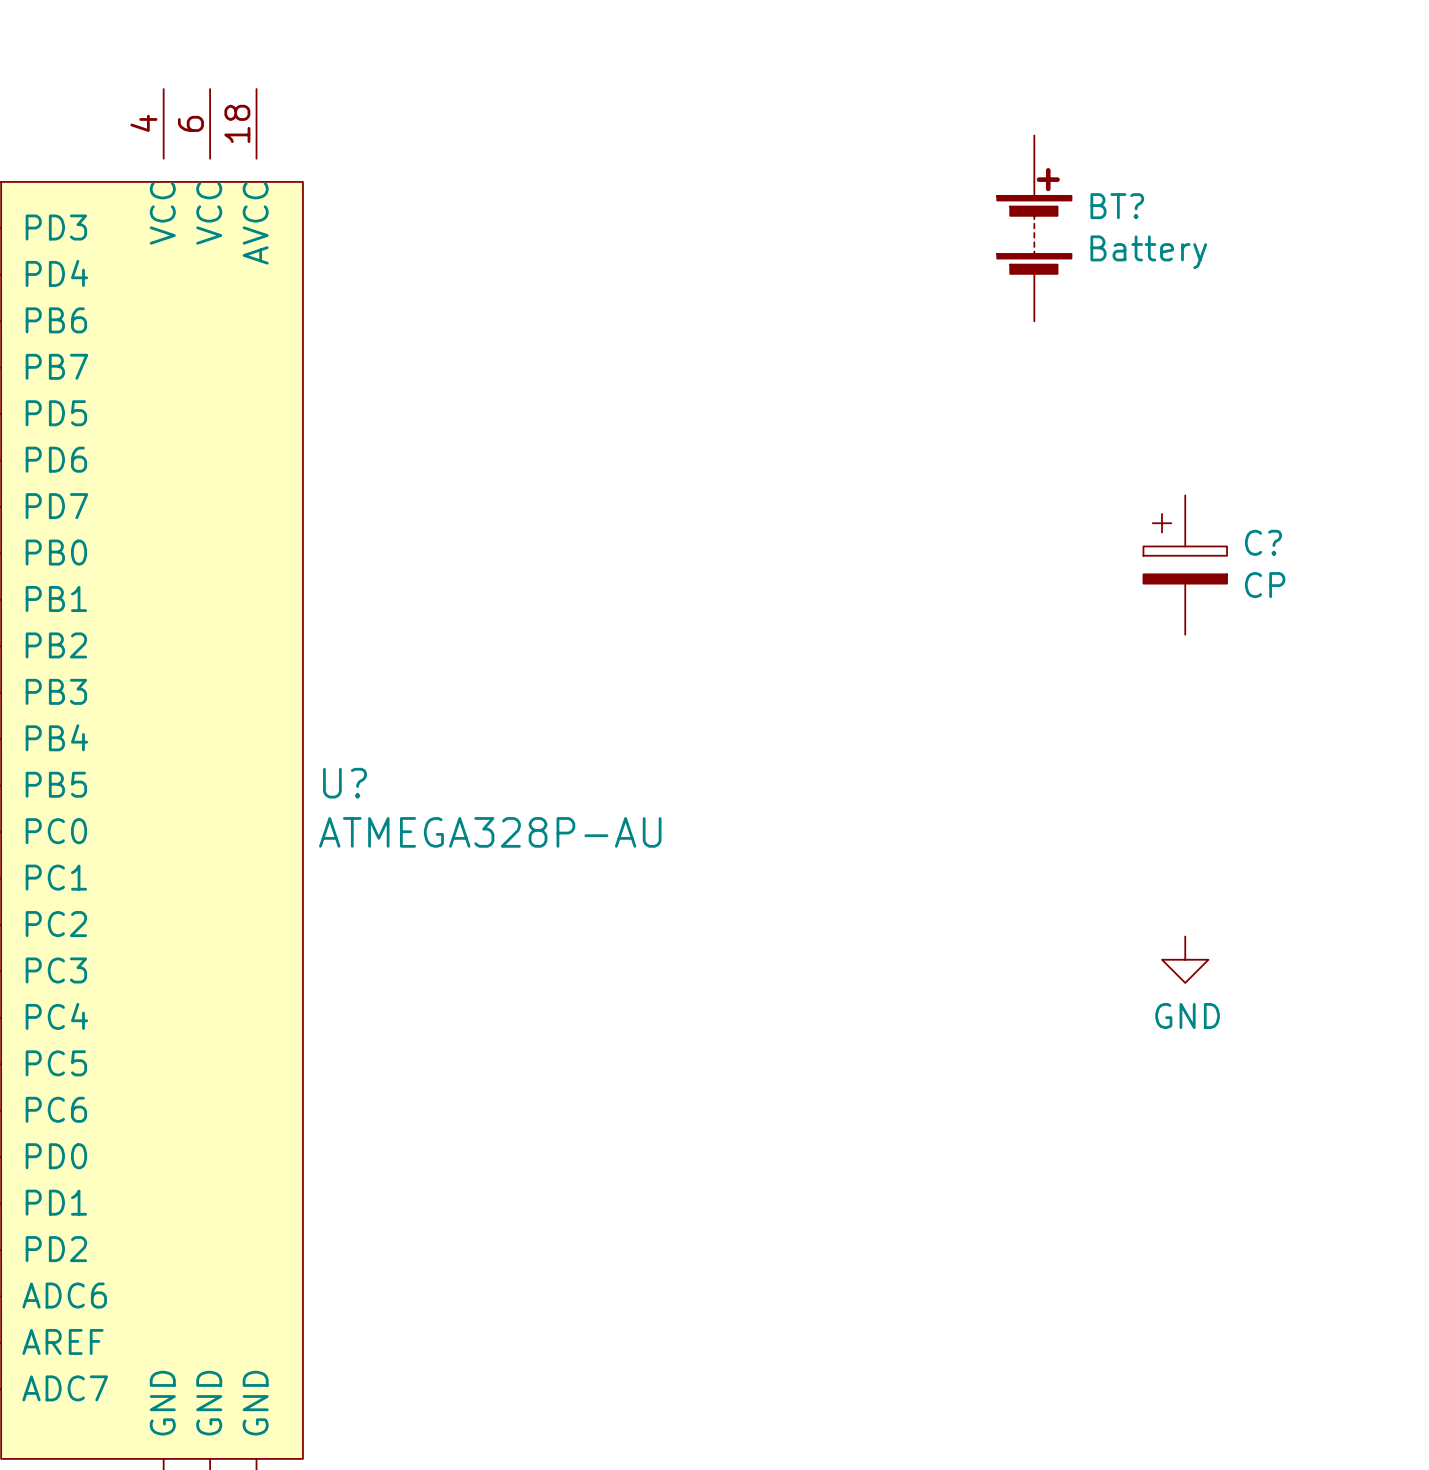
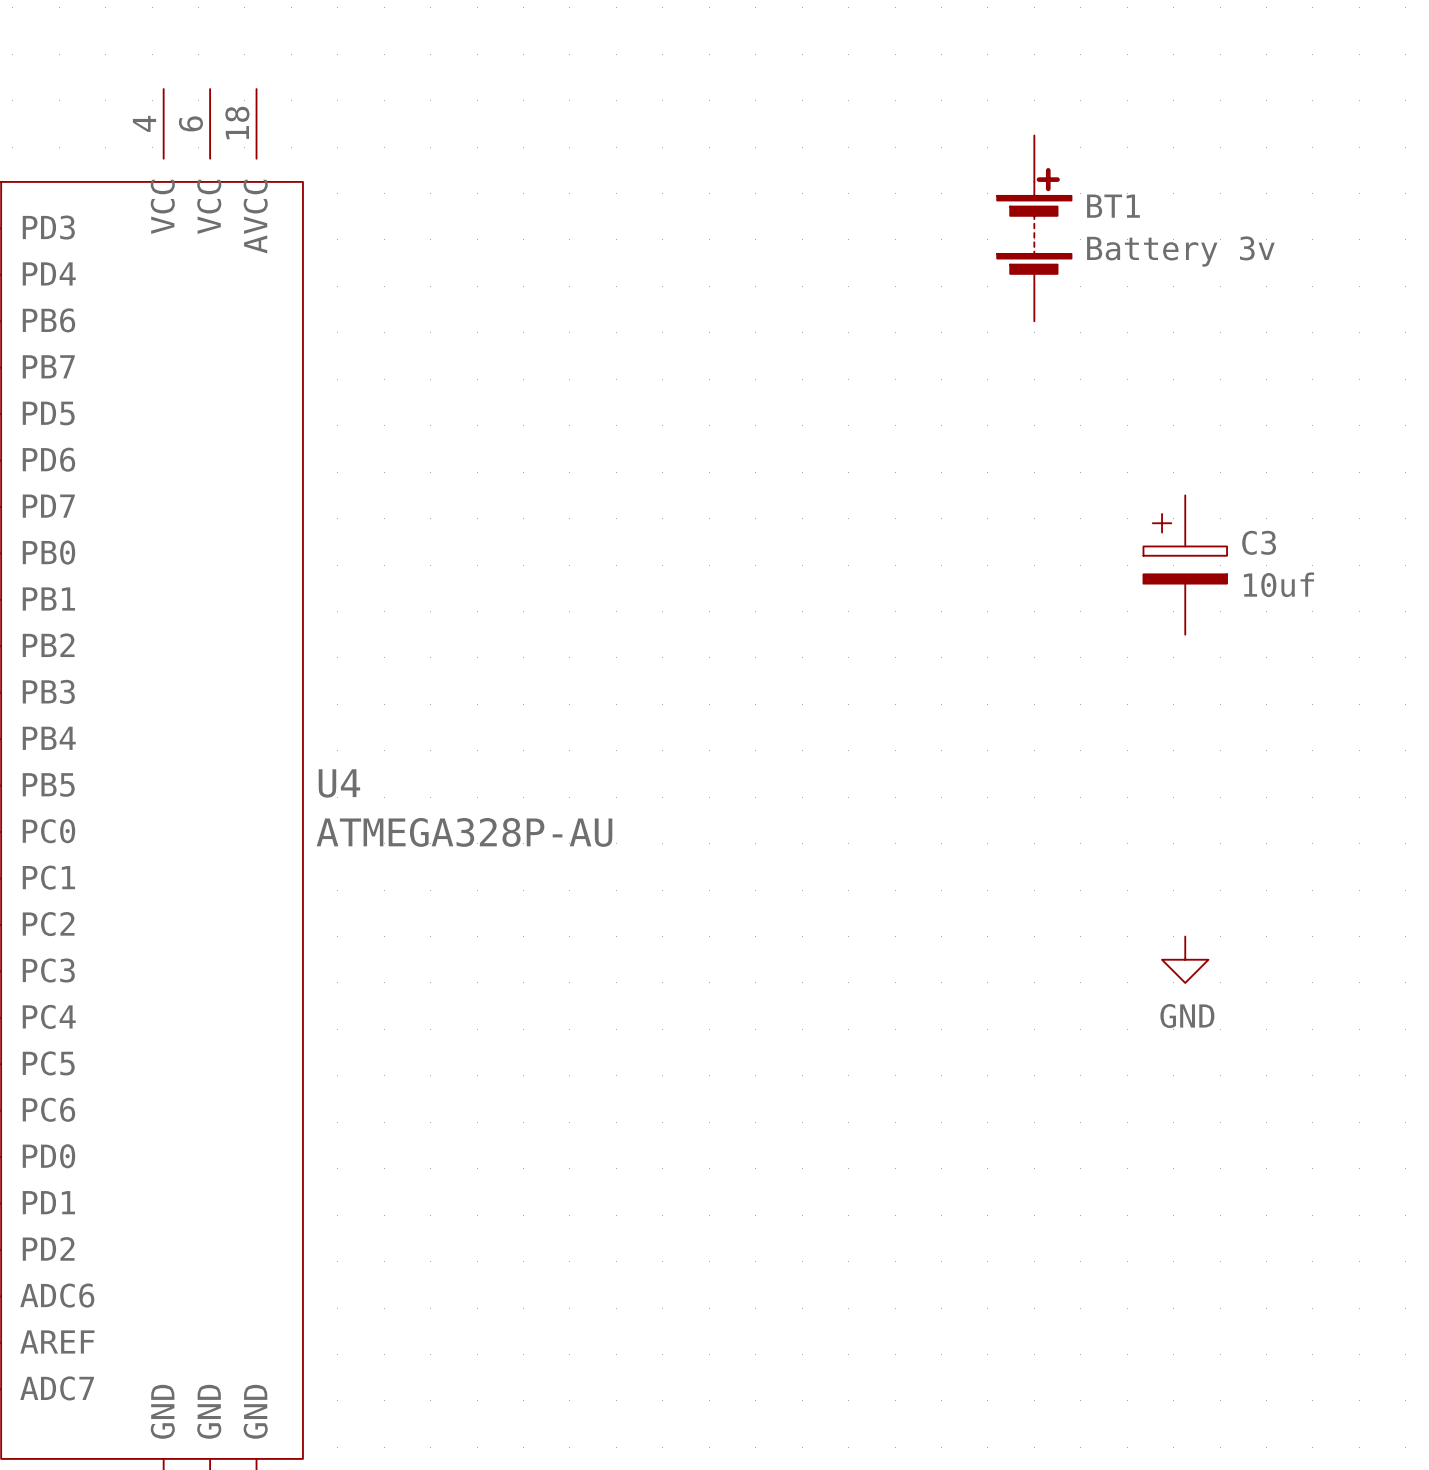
BT? name: BT? (1117, 206) -> BT1 (1113, 206)
BT? value: Battery (1148, 252) -> Battery 3v (1180, 251)
C? name: C? (1263, 542) -> C3 (1259, 542)
C? value: CP (1265, 585) -> 10uf (1278, 584)
U? name: U? (345, 783) -> U4 (339, 783)

